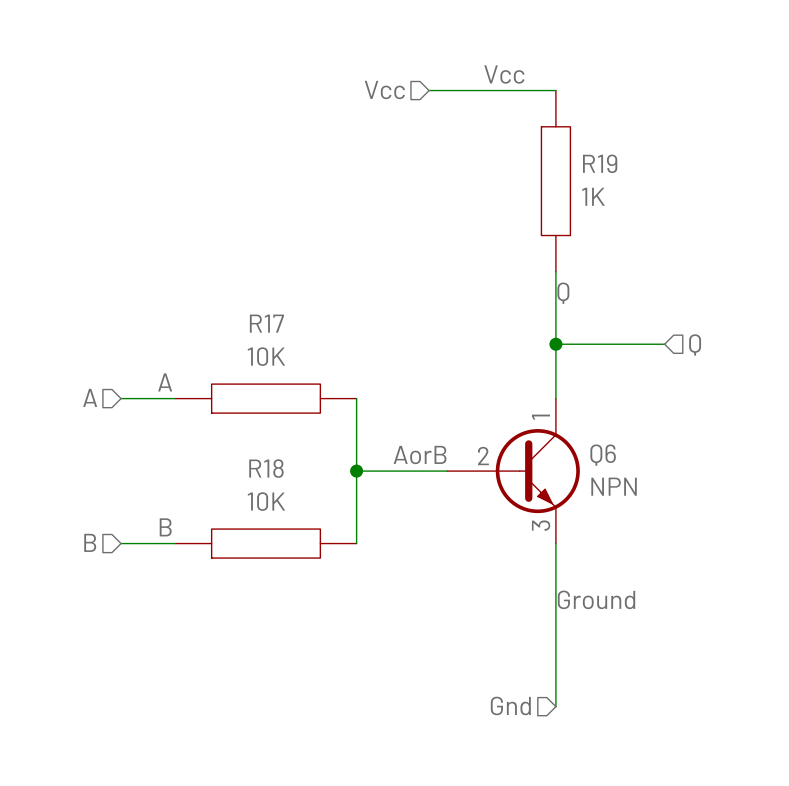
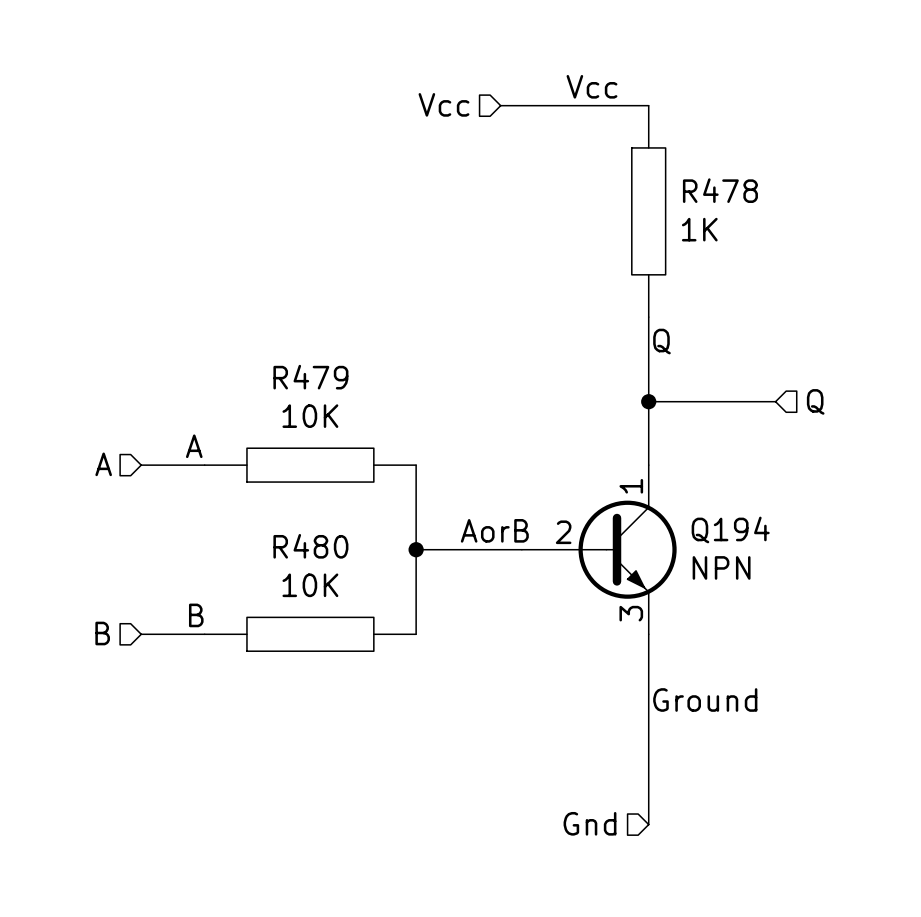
R19 name: R19 (600, 163) -> R478 (720, 190)
R17 name: R17 (266, 323) -> R479 (310, 377)
Q6 name: Q6 (603, 455) -> Q194 (730, 529)
R18 name: R18 (266, 468) -> R480 (310, 546)

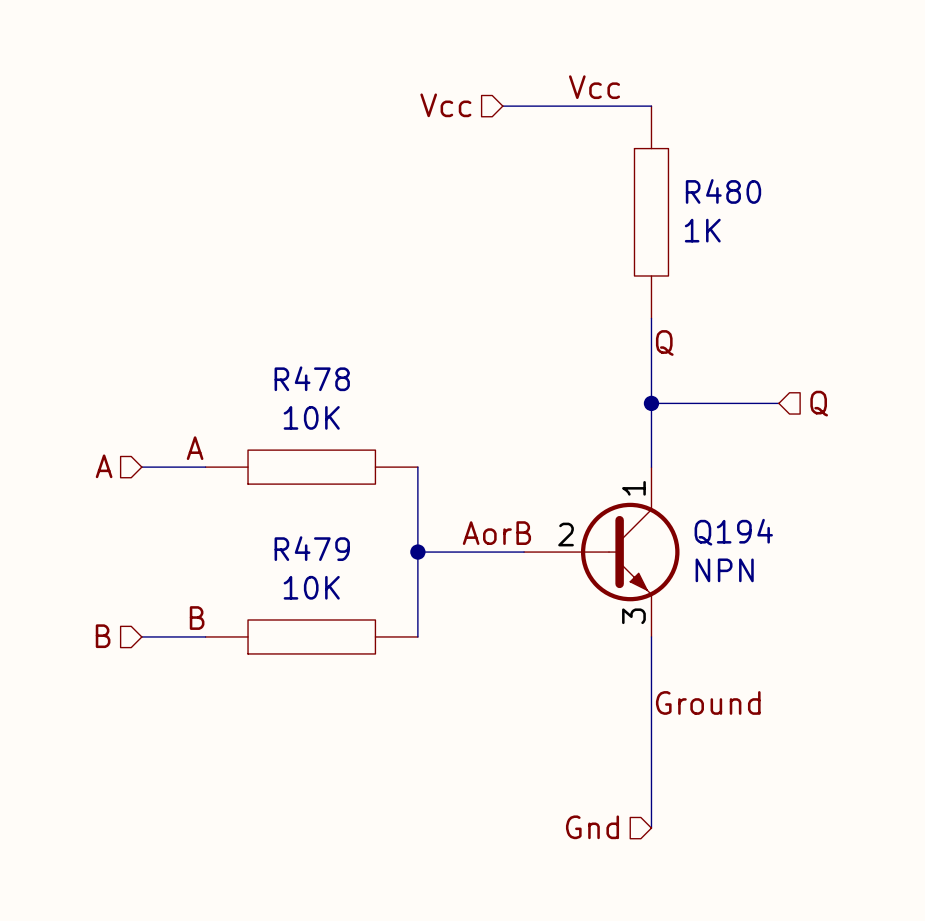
R478 name: R478 (720, 190) -> R480 (723, 191)
R479 name: R479 (310, 377) -> R478 (312, 378)
R480 name: R480 (310, 546) -> R479 (312, 548)

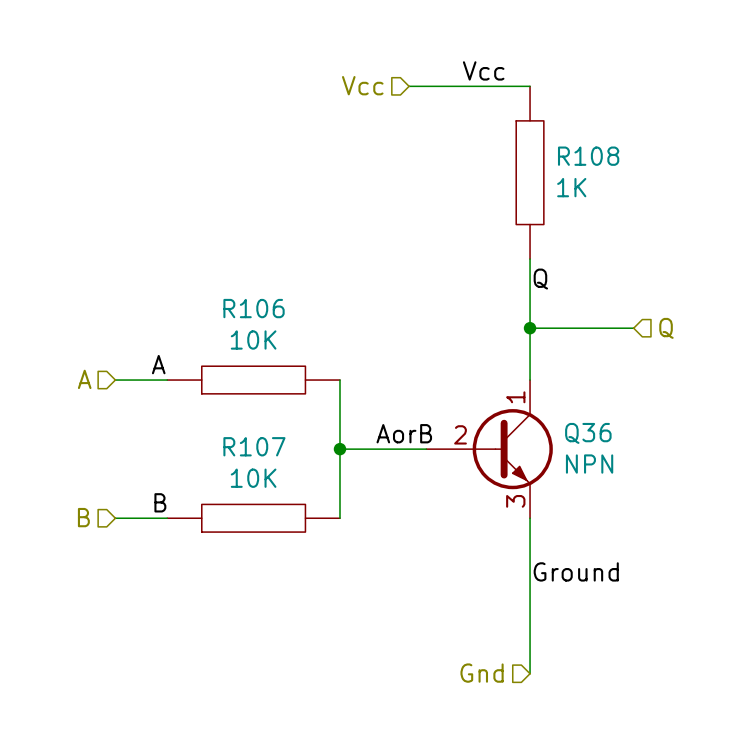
R480 name: R480 (723, 191) -> R108 (588, 156)
R478 name: R478 (312, 378) -> R106 (254, 308)
Q194 name: Q194 (733, 532) -> Q36 (588, 433)
R479 name: R479 (312, 548) -> R107 (254, 446)

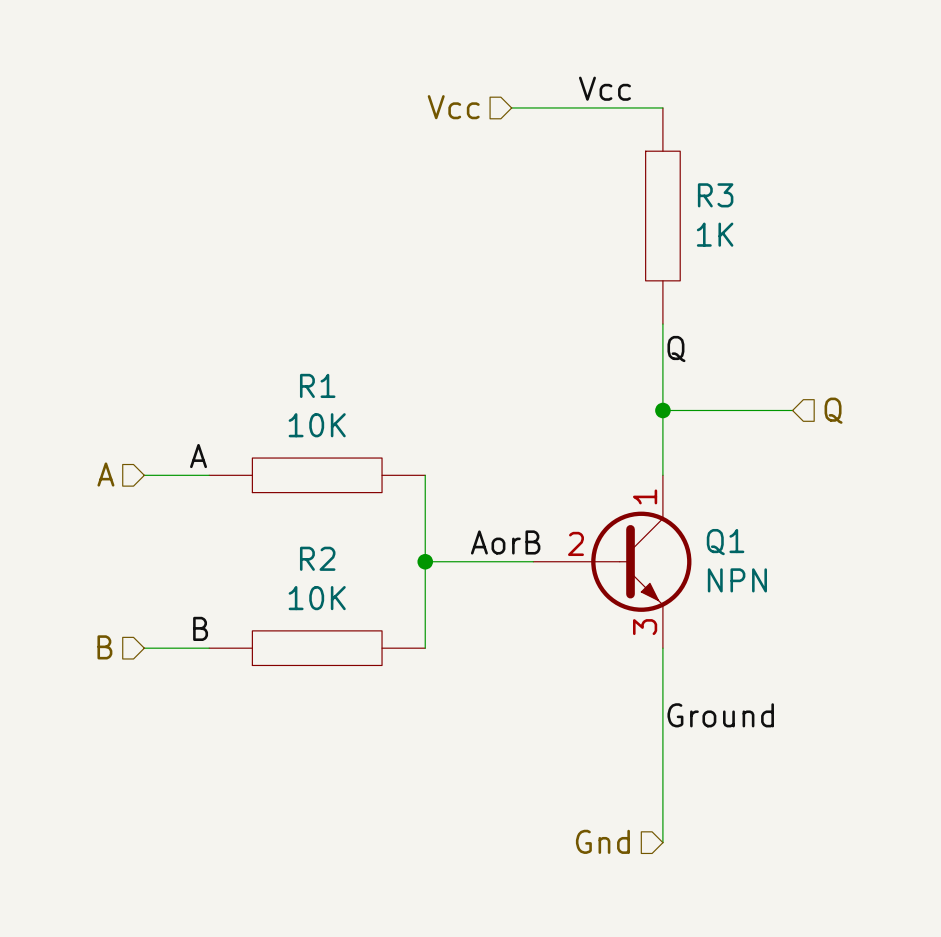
R108 name: R108 (588, 156) -> R3 (715, 195)
R106 name: R106 (254, 308) -> R1 (317, 385)
Q36 name: Q36 (588, 433) -> Q1 (725, 542)
R107 name: R107 (254, 446) -> R2 (317, 558)

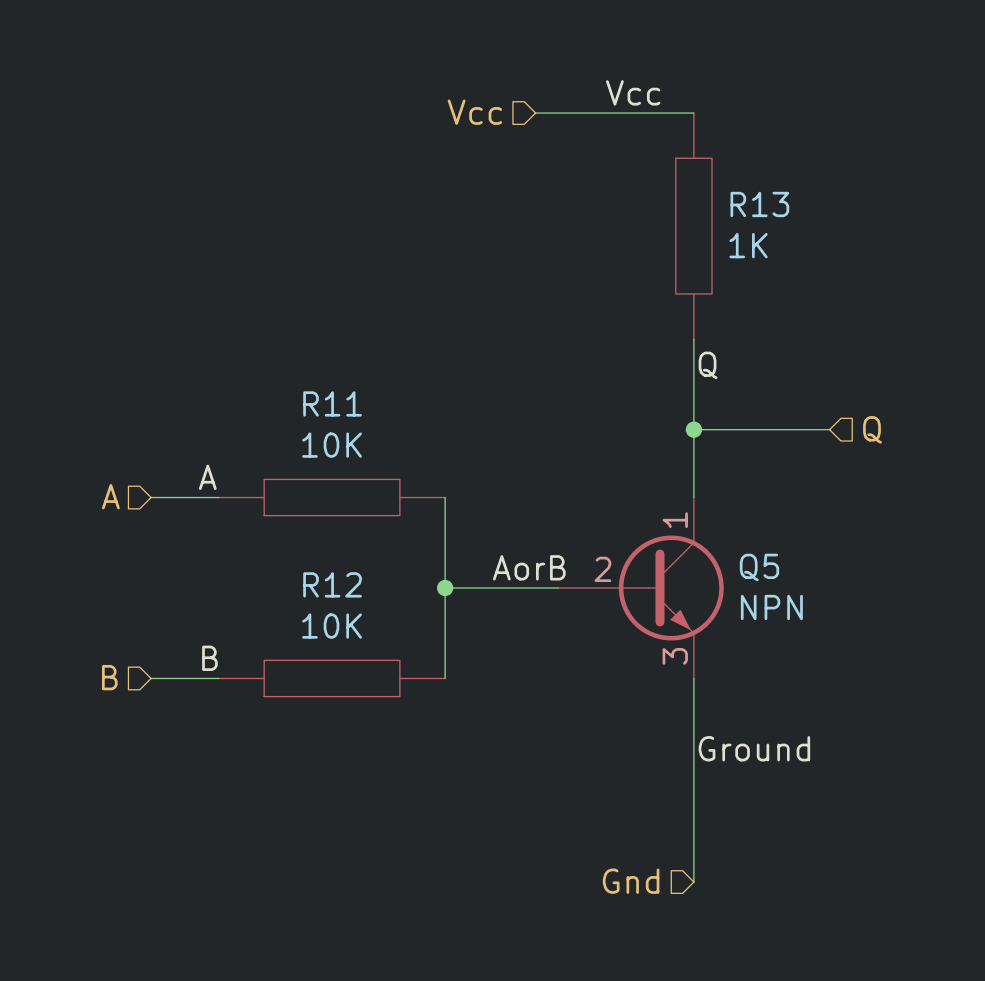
R3 name: R3 (715, 195) -> R13 (759, 204)
R1 name: R1 (317, 385) -> R11 (332, 403)
Q1 name: Q1 (725, 542) -> Q5 (759, 567)
R2 name: R2 (317, 558) -> R12 (332, 584)

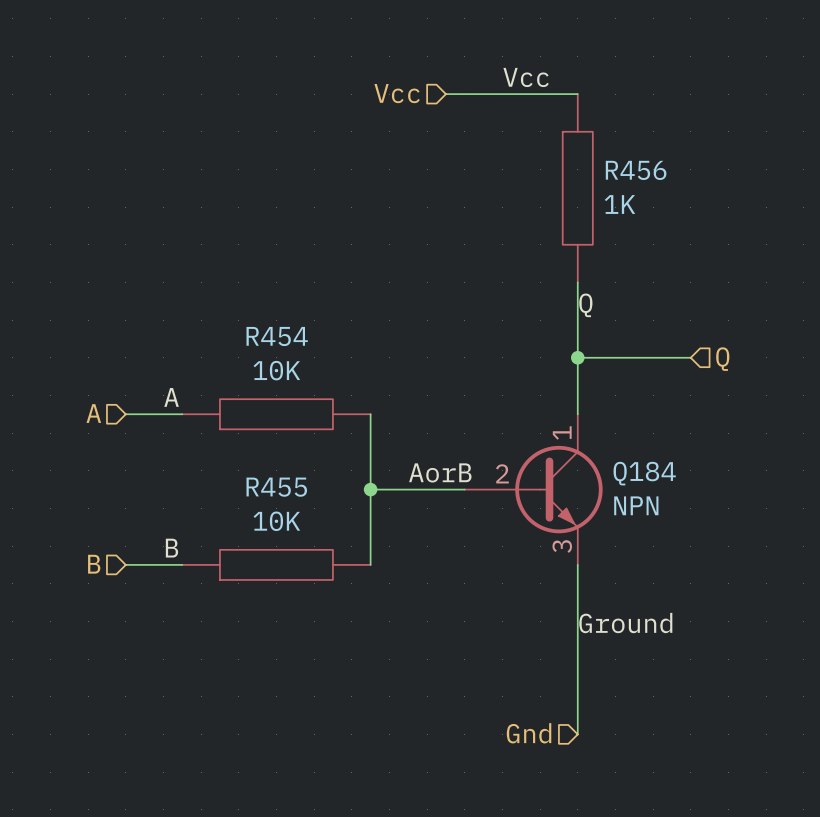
R13 name: R13 (759, 204) -> R456 (636, 170)
R11 name: R11 (332, 403) -> R454 (277, 336)
Q5 name: Q5 (759, 567) -> Q184 (644, 473)
R12 name: R12 (332, 584) -> R455 (276, 487)

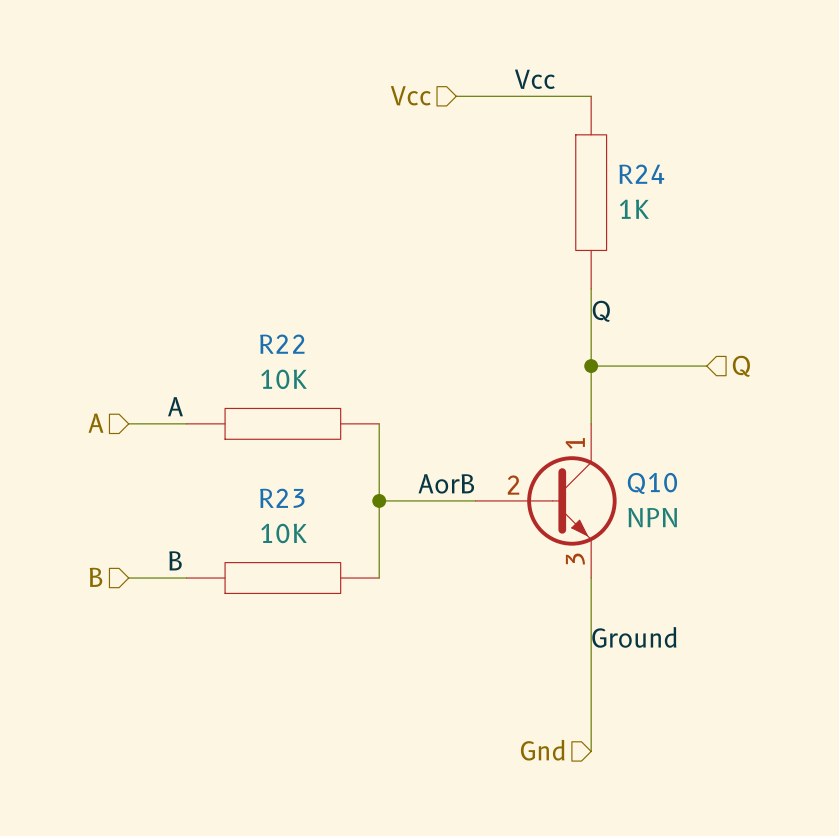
R456 name: R456 (636, 170) -> R24 (641, 174)
R454 name: R454 (277, 336) -> R22 (282, 344)
Q184 name: Q184 (644, 473) -> Q10 (652, 483)
R455 name: R455 (276, 487) -> R23 (282, 498)

